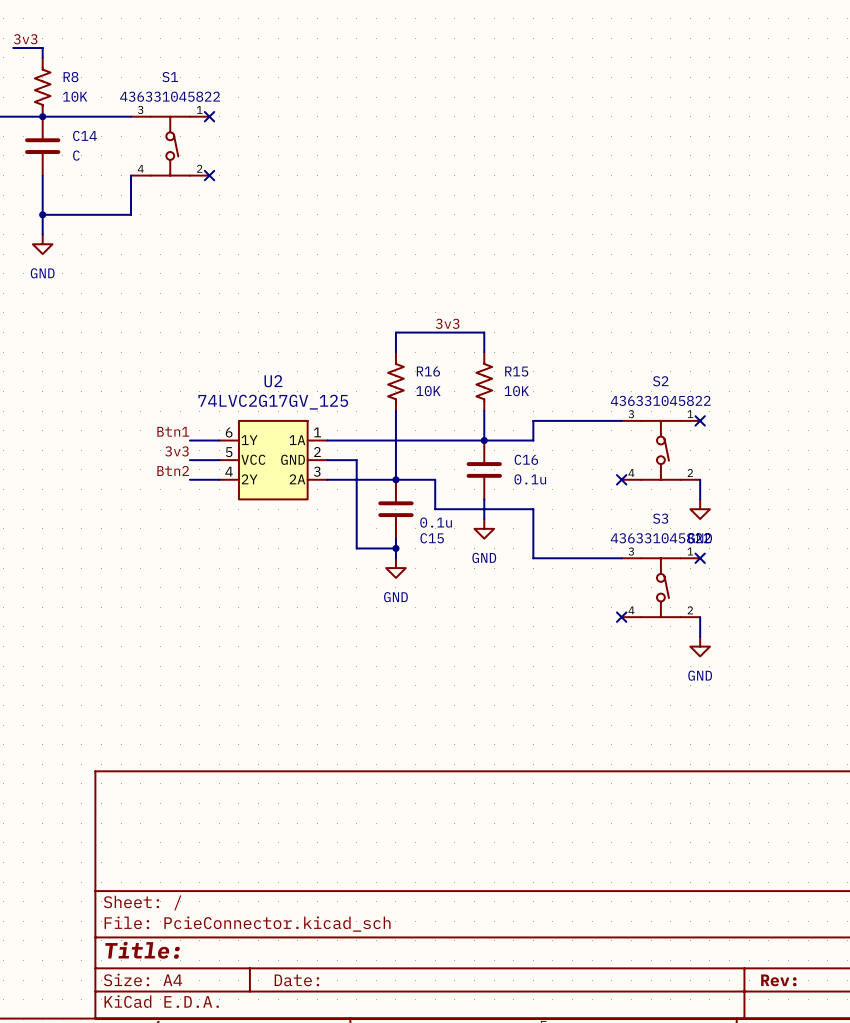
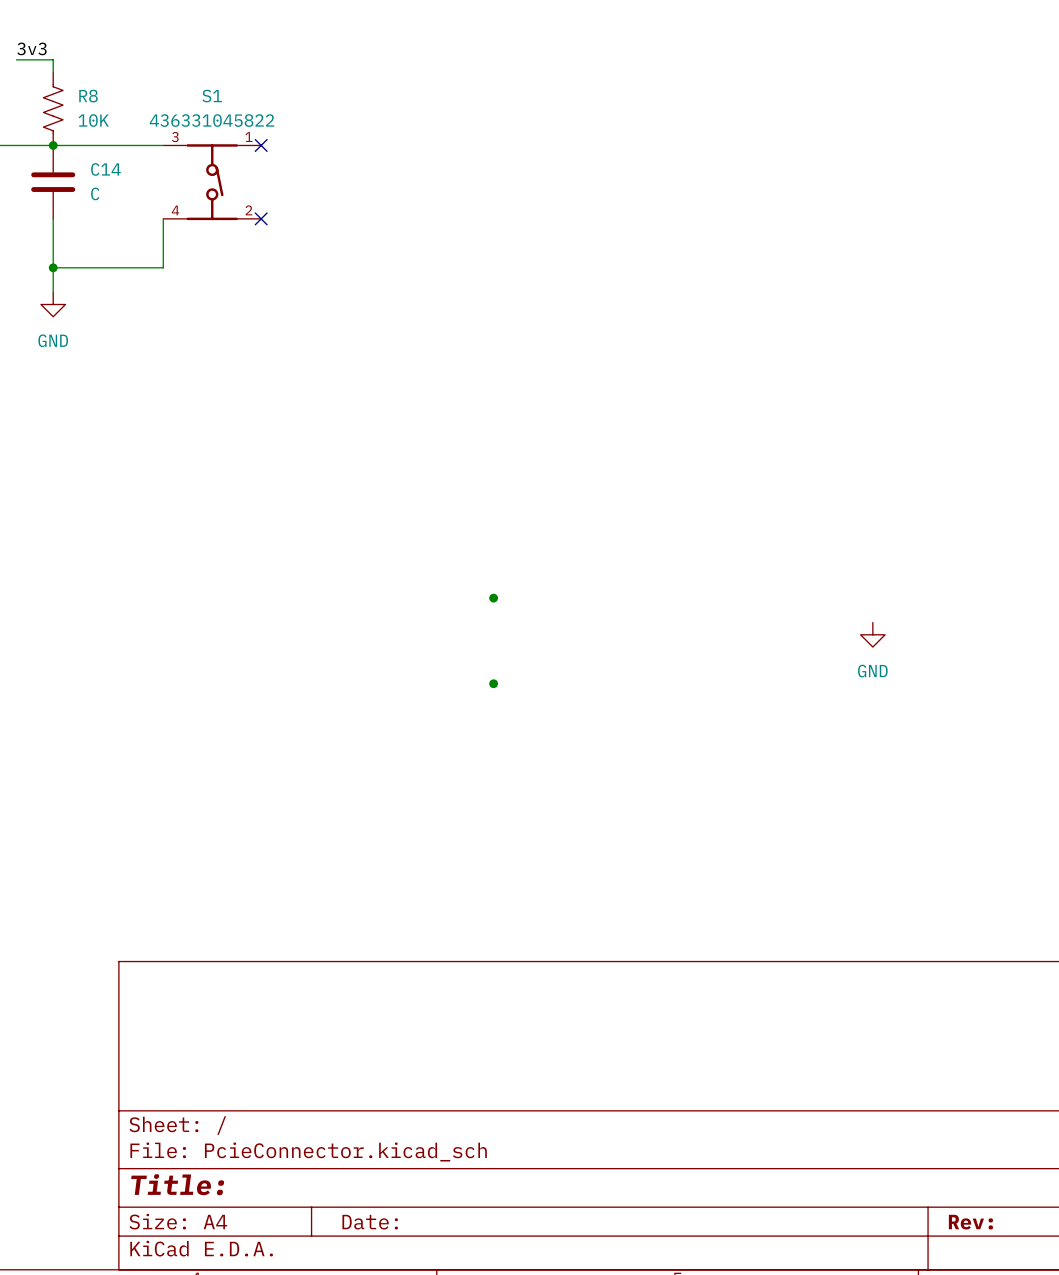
label: 3v3 (447, 323) -> none
wire: (395, 352) (395, 332) (484, 332) (484, 352) -> none
R16: 10K (395, 381) -> none
R15: 10K (484, 381) -> none
wire: (395, 411) (395, 479) -> none
wire: (484, 411) (484, 440) -> none
wire: (621, 420) (533, 420) (533, 440) (327, 440) -> none
no-connect mark: (700, 420) -> none
label: Btn1 (173, 431) -> none
wire: (189, 440) (219, 440) -> none
junction: (484, 440) -> none
S2: 436331045822 (660, 450) -> none
label: 3v3 (176, 451) -> none
wire: (189, 460) (219, 460) -> none
U2: 74LVC2G17GV_125 (273, 460) -> none
wire: (327, 460) (356, 460) (356, 548) (395, 548) -> none
C16: 0.1u (484, 469) -> none
label: Btn2 (173, 470) -> none
wire: (189, 479) (219, 479) -> none
wire: (327, 479) (435, 479) (435, 509) (533, 509) (533, 558) (621, 558) -> none
no-connect mark: (621, 479) -> none
wire: (700, 479) (700, 499) -> none
wire: (484, 499) (484, 519) -> none
C15: 0.1u (395, 509) -> none
power symbol: GND (484, 528) -> none
wire: (395, 538) (395, 558) -> none
no-connect mark: (700, 558) -> none
power symbol: GND (395, 568) -> none
S3: 436331045822 (660, 587) -> none
no-connect mark: (621, 617) -> none
wire: (700, 617) (700, 636) -> none
power symbol: GND (700, 646) -> none

